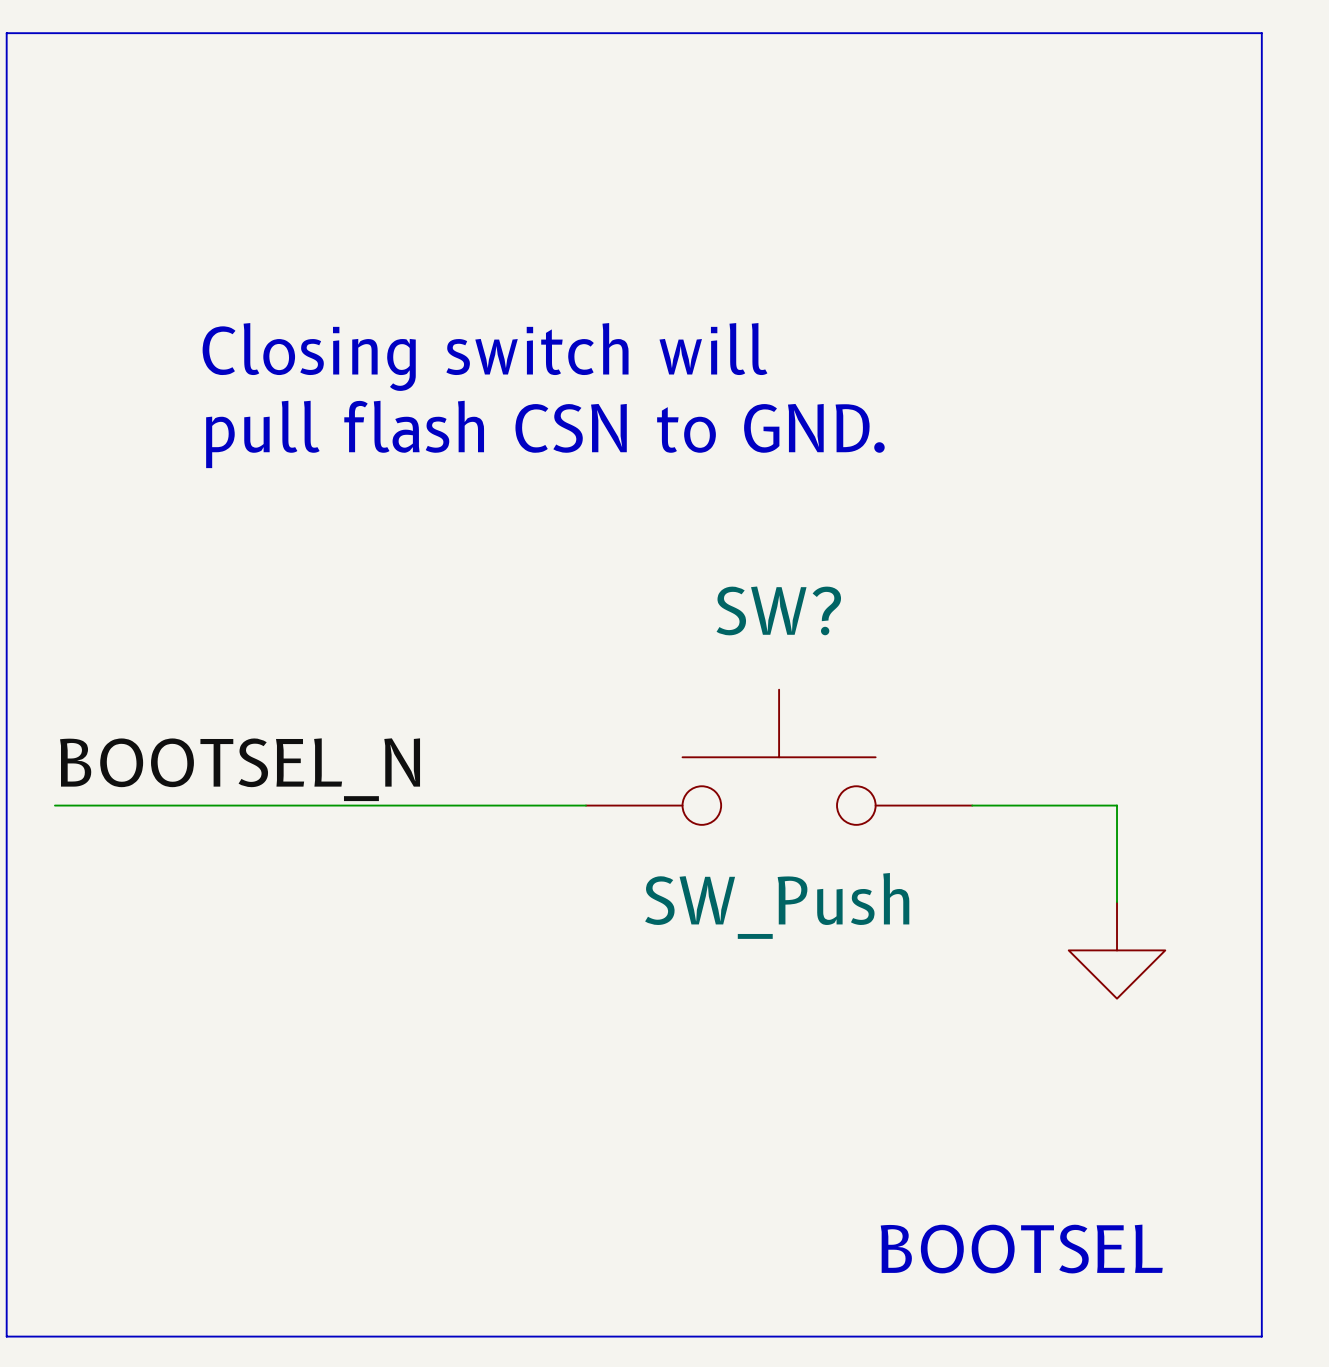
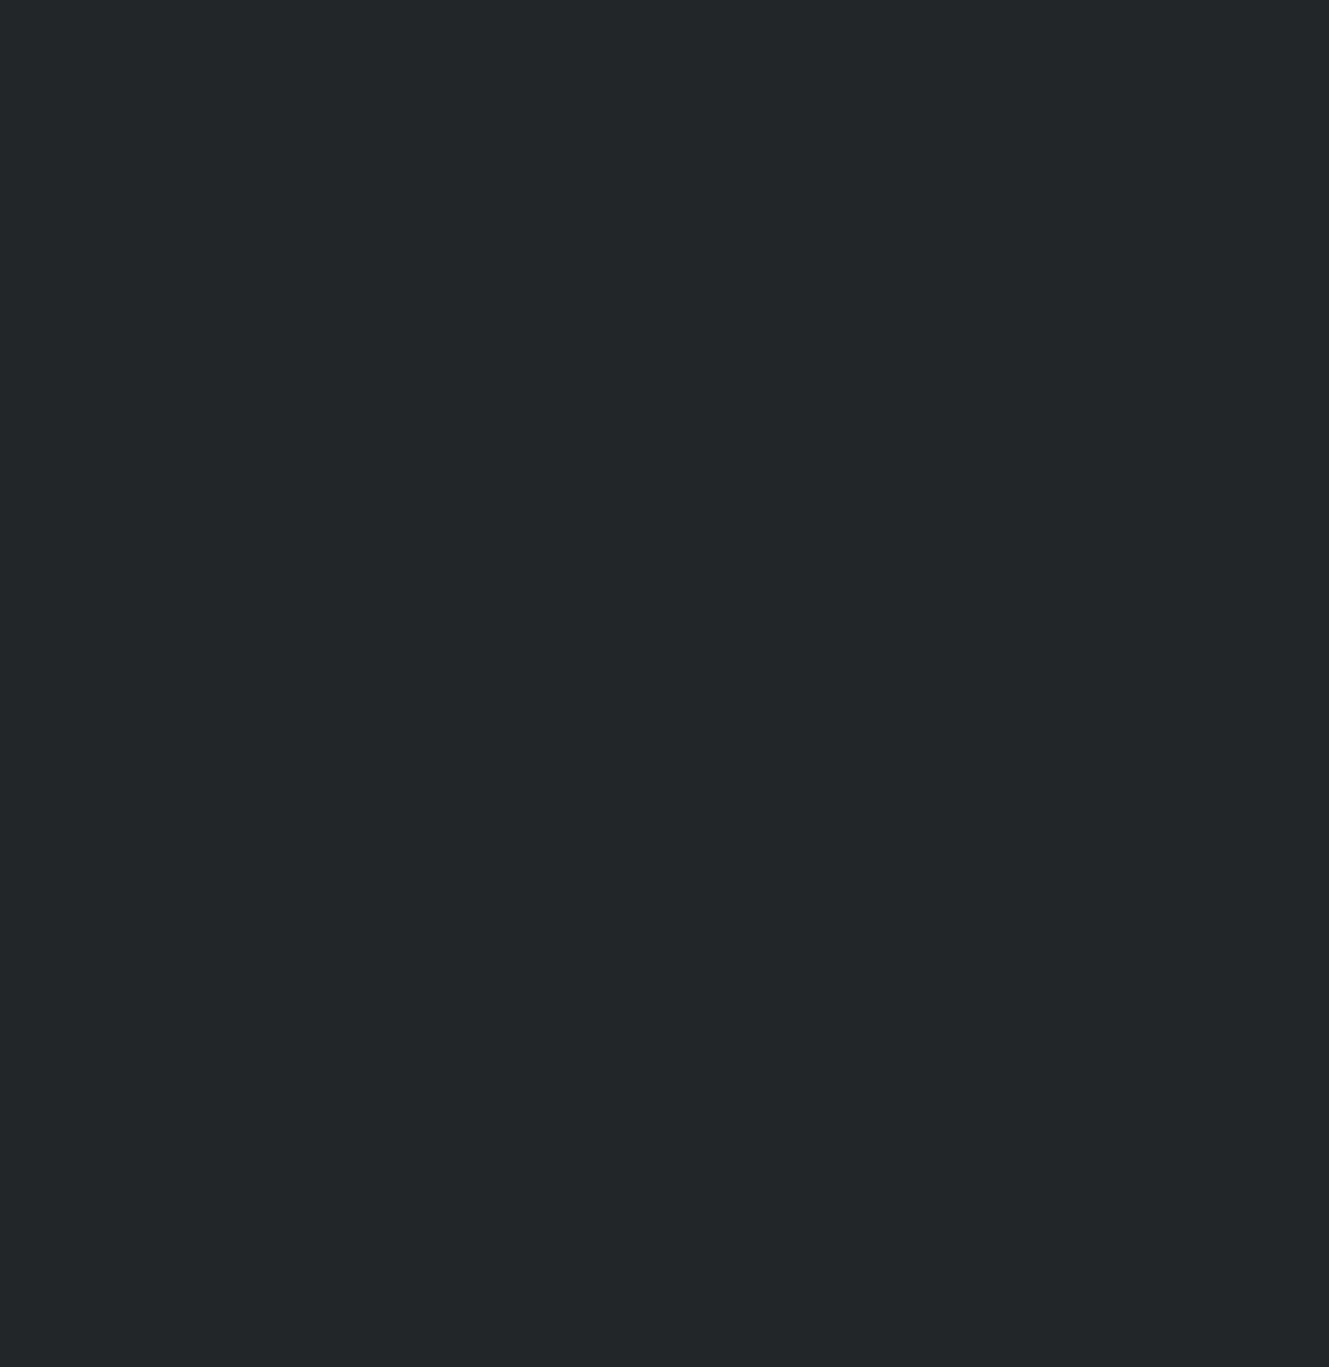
line: (6, 33) (6, 1336) (1261, 1336) (1261, 33) (6, 33) -> none
text: Closing switch will (485, 356) -> none
text: pull flash CSN to GND. (545, 434) -> none
SW?: SW_Push (779, 757) -> none
label: BOOTSEL_N (240, 769) -> none
wire: (54, 805) (585, 805) -> none
wire: (972, 805) (1117, 805) (1117, 902) -> none
power symbol: (1117, 950) -> none
text: BOOTSEL (1021, 1249) -> none

